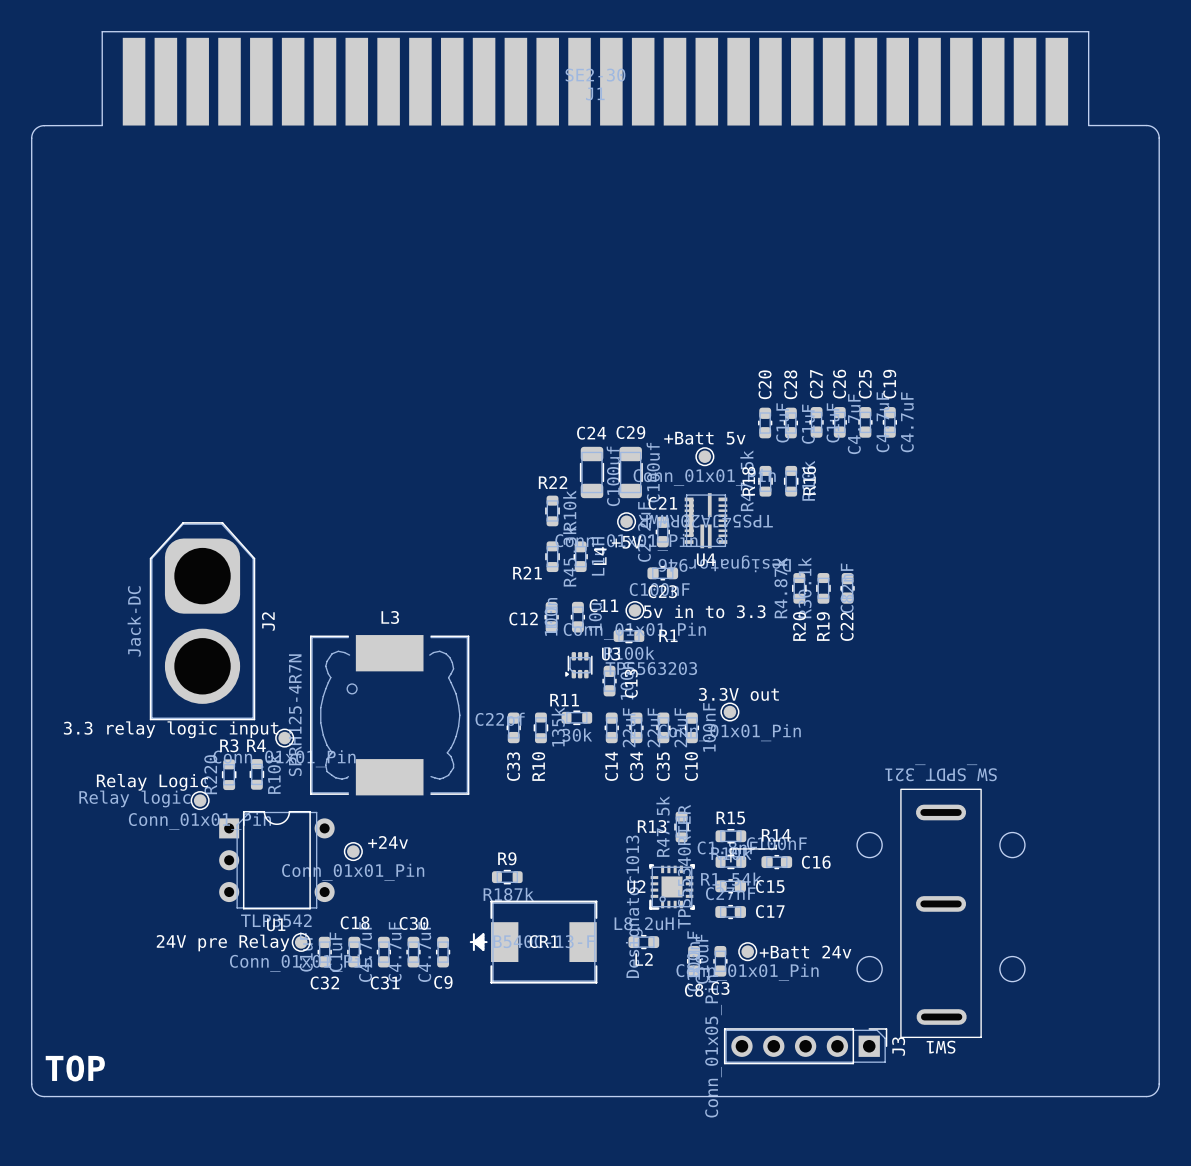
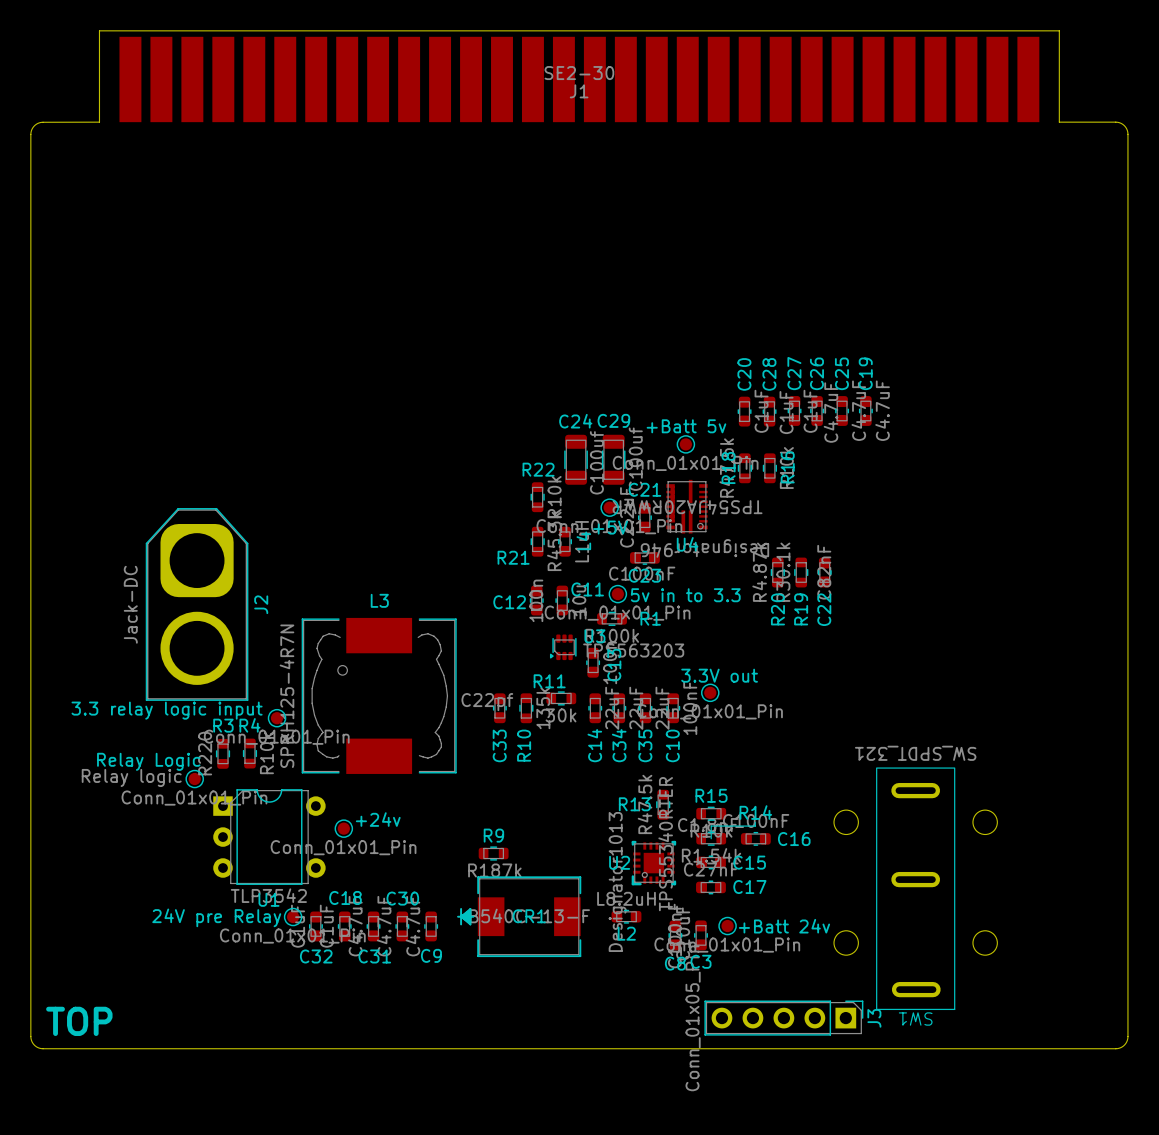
J1 footprint: [31, 31, 1160, 1097] -> [30, 30, 1129, 1050]

